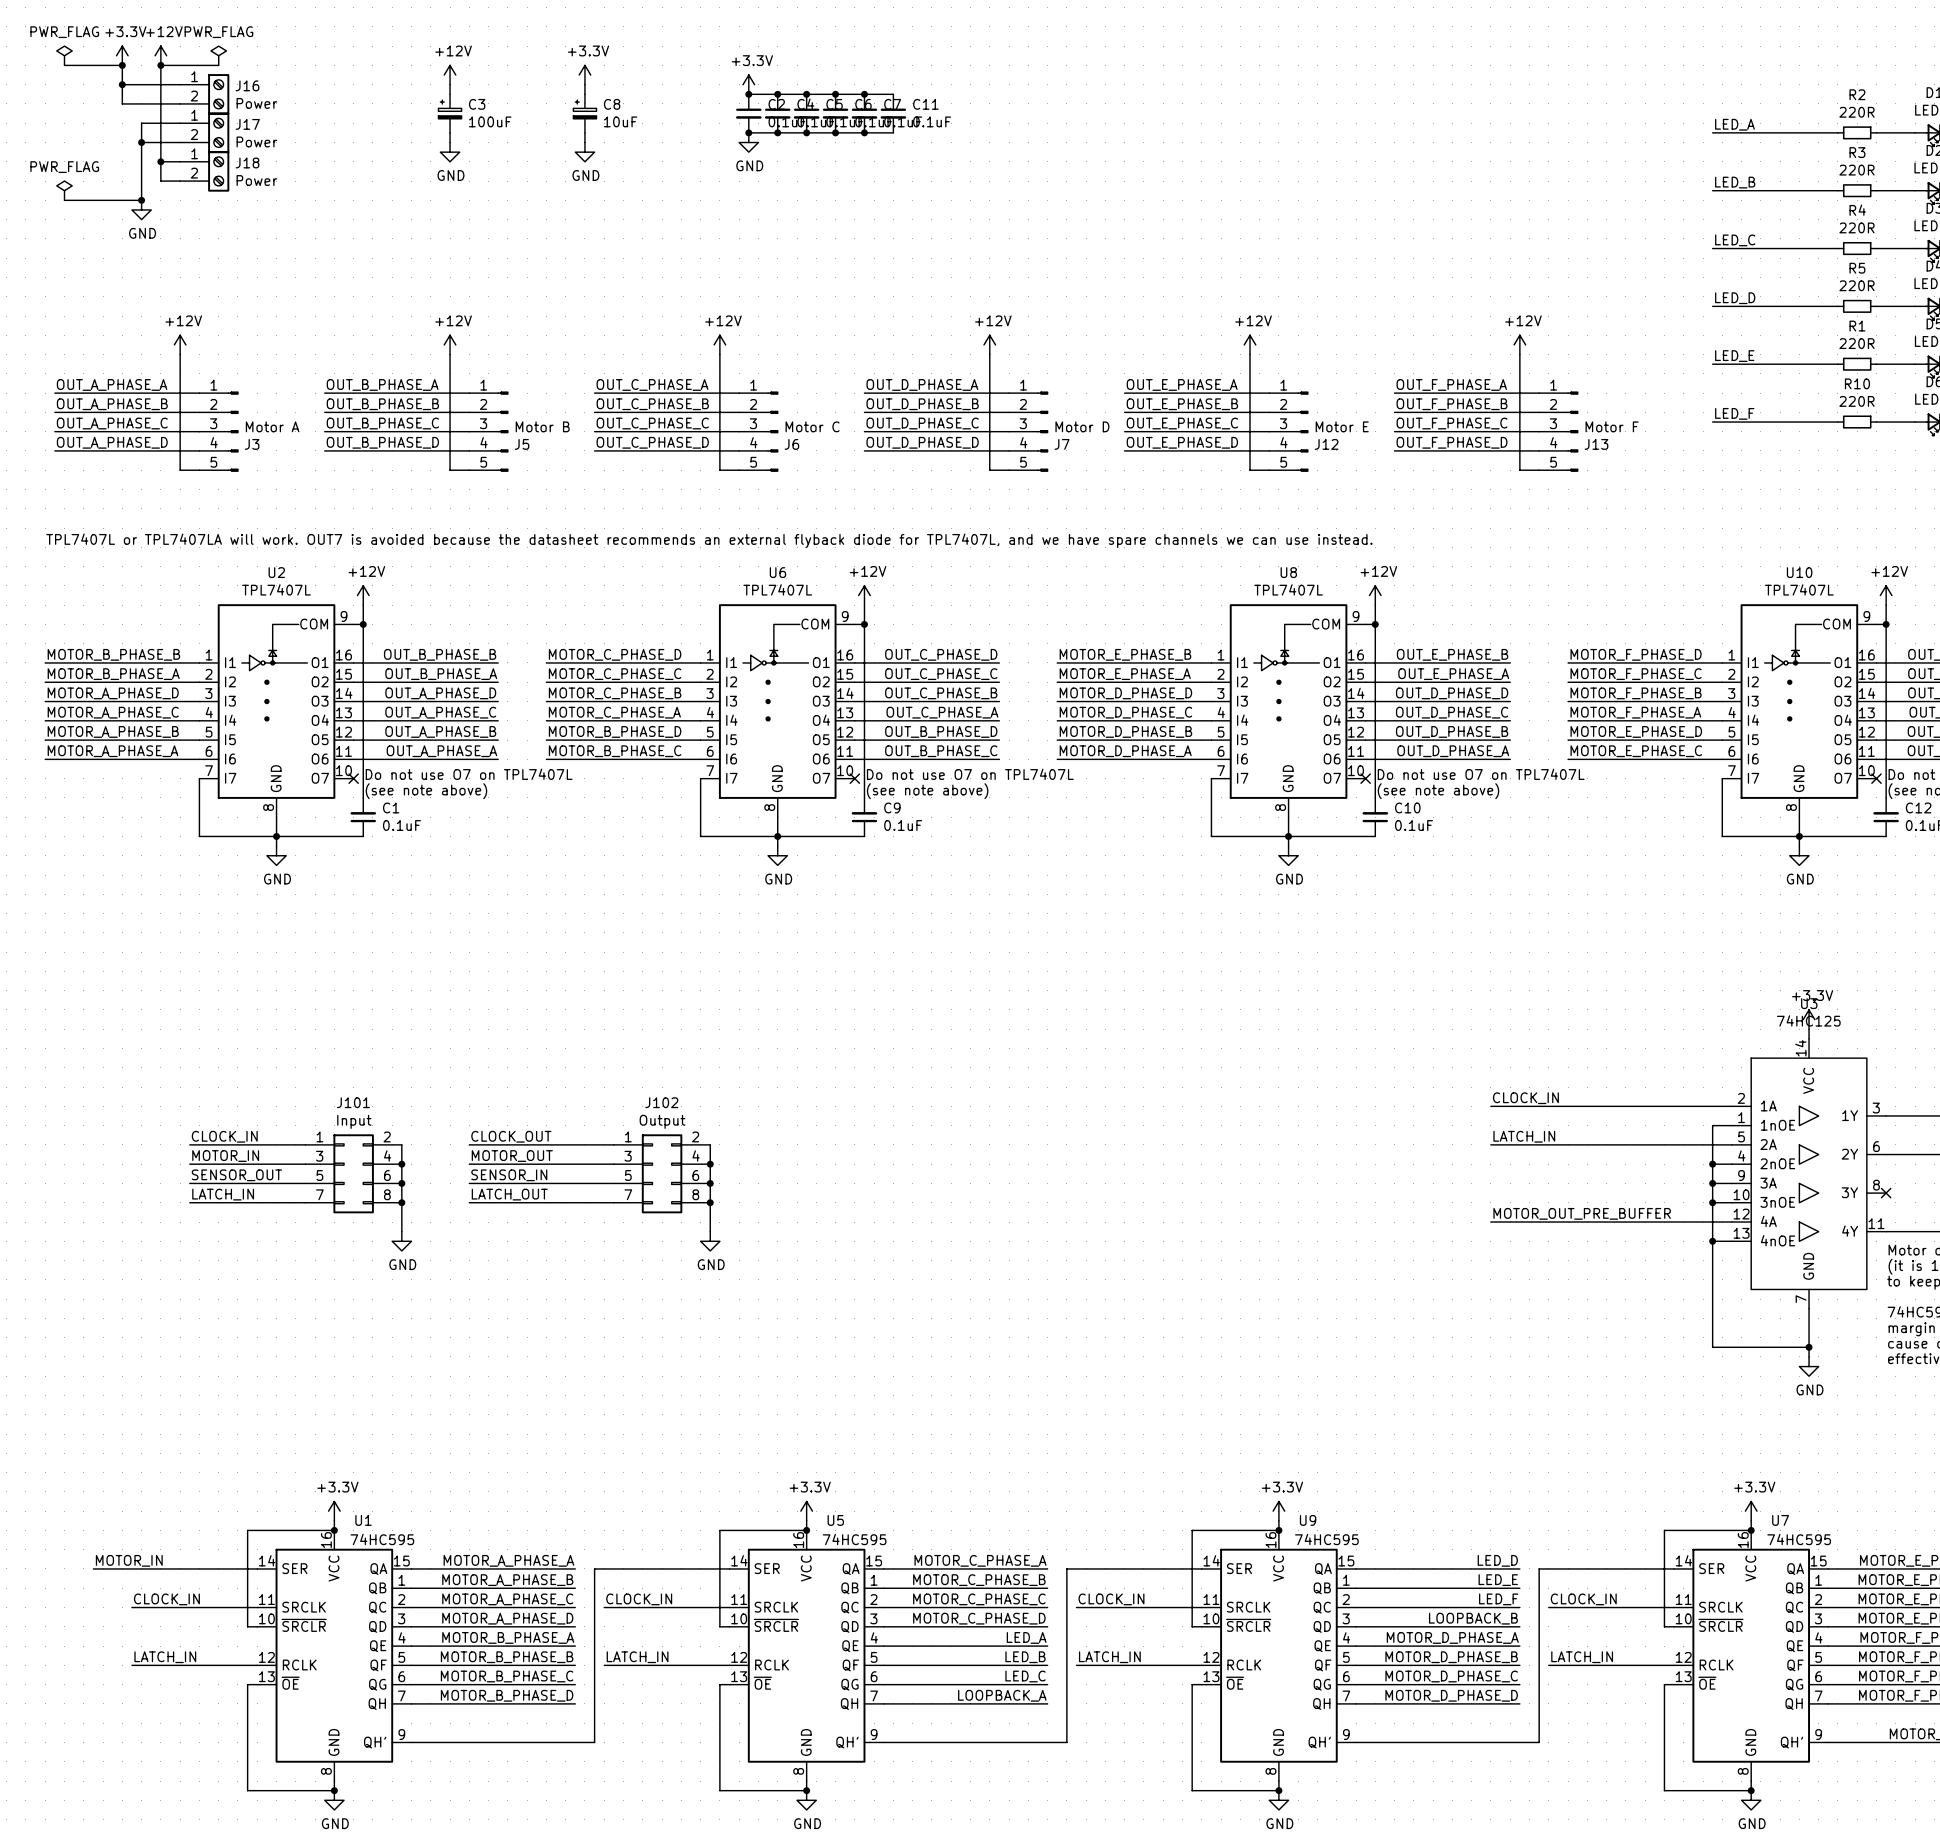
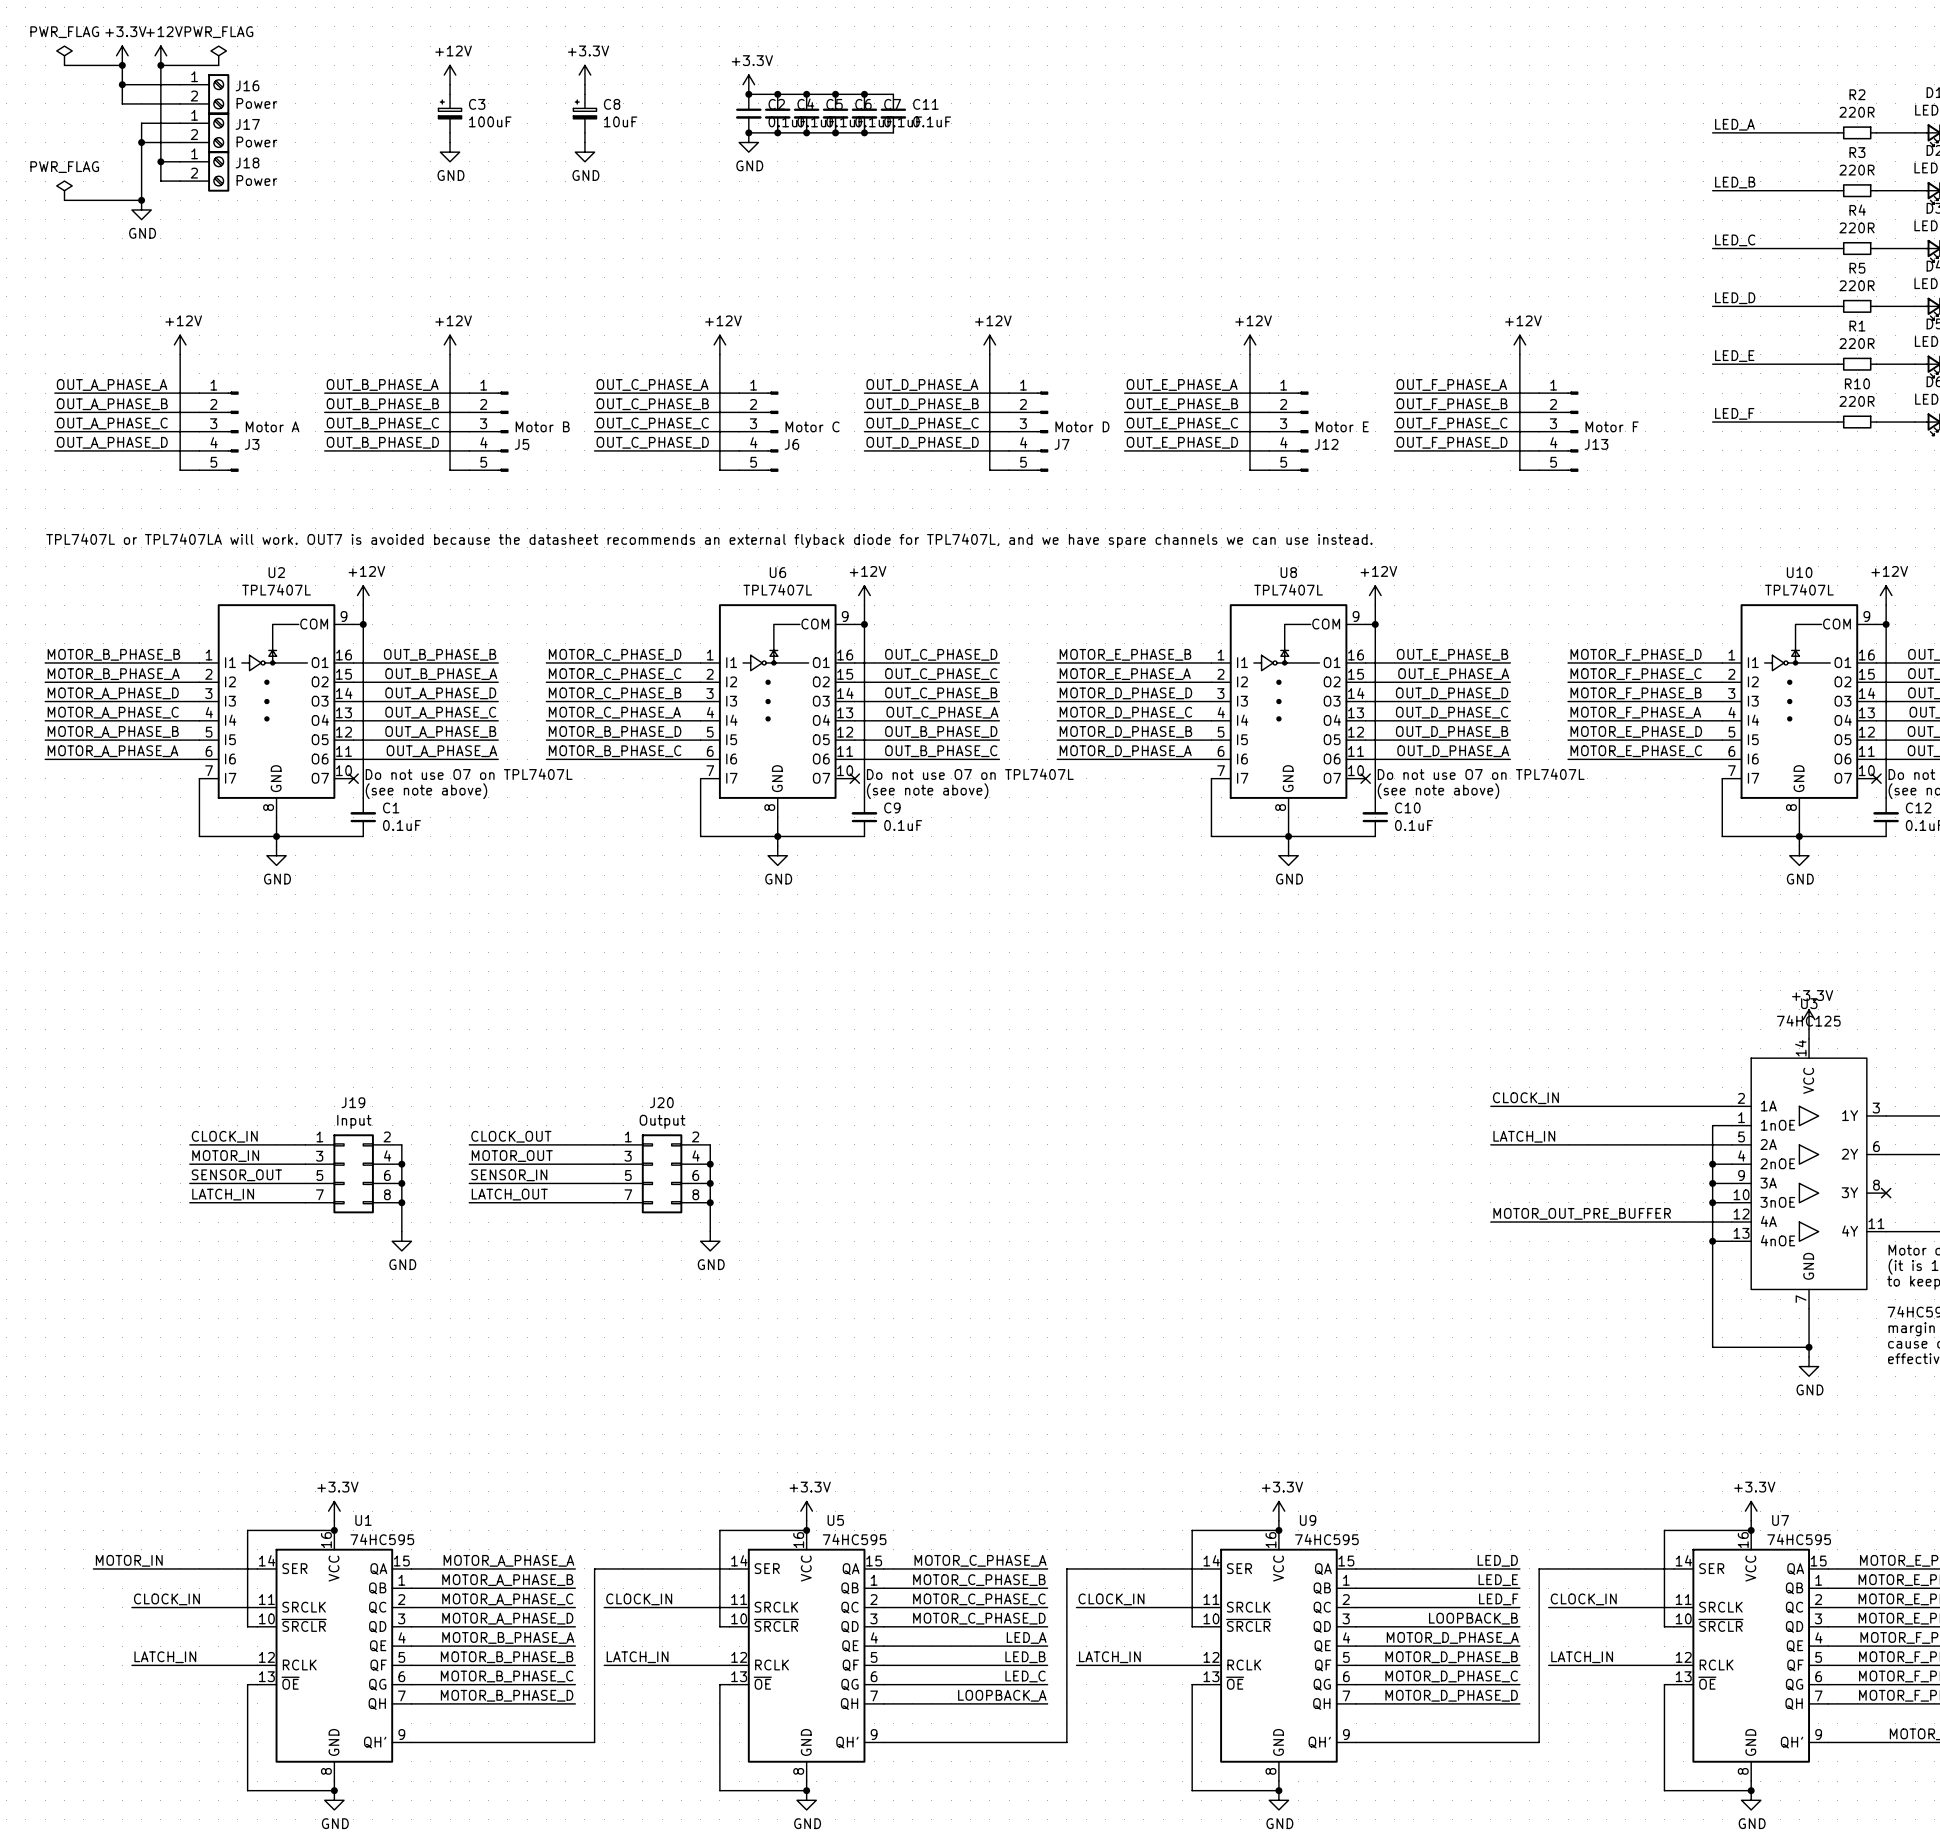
J101 name: J101 (353, 1102) -> J19 (353, 1102)
J102 name: J102 (661, 1102) -> J20 (661, 1102)

